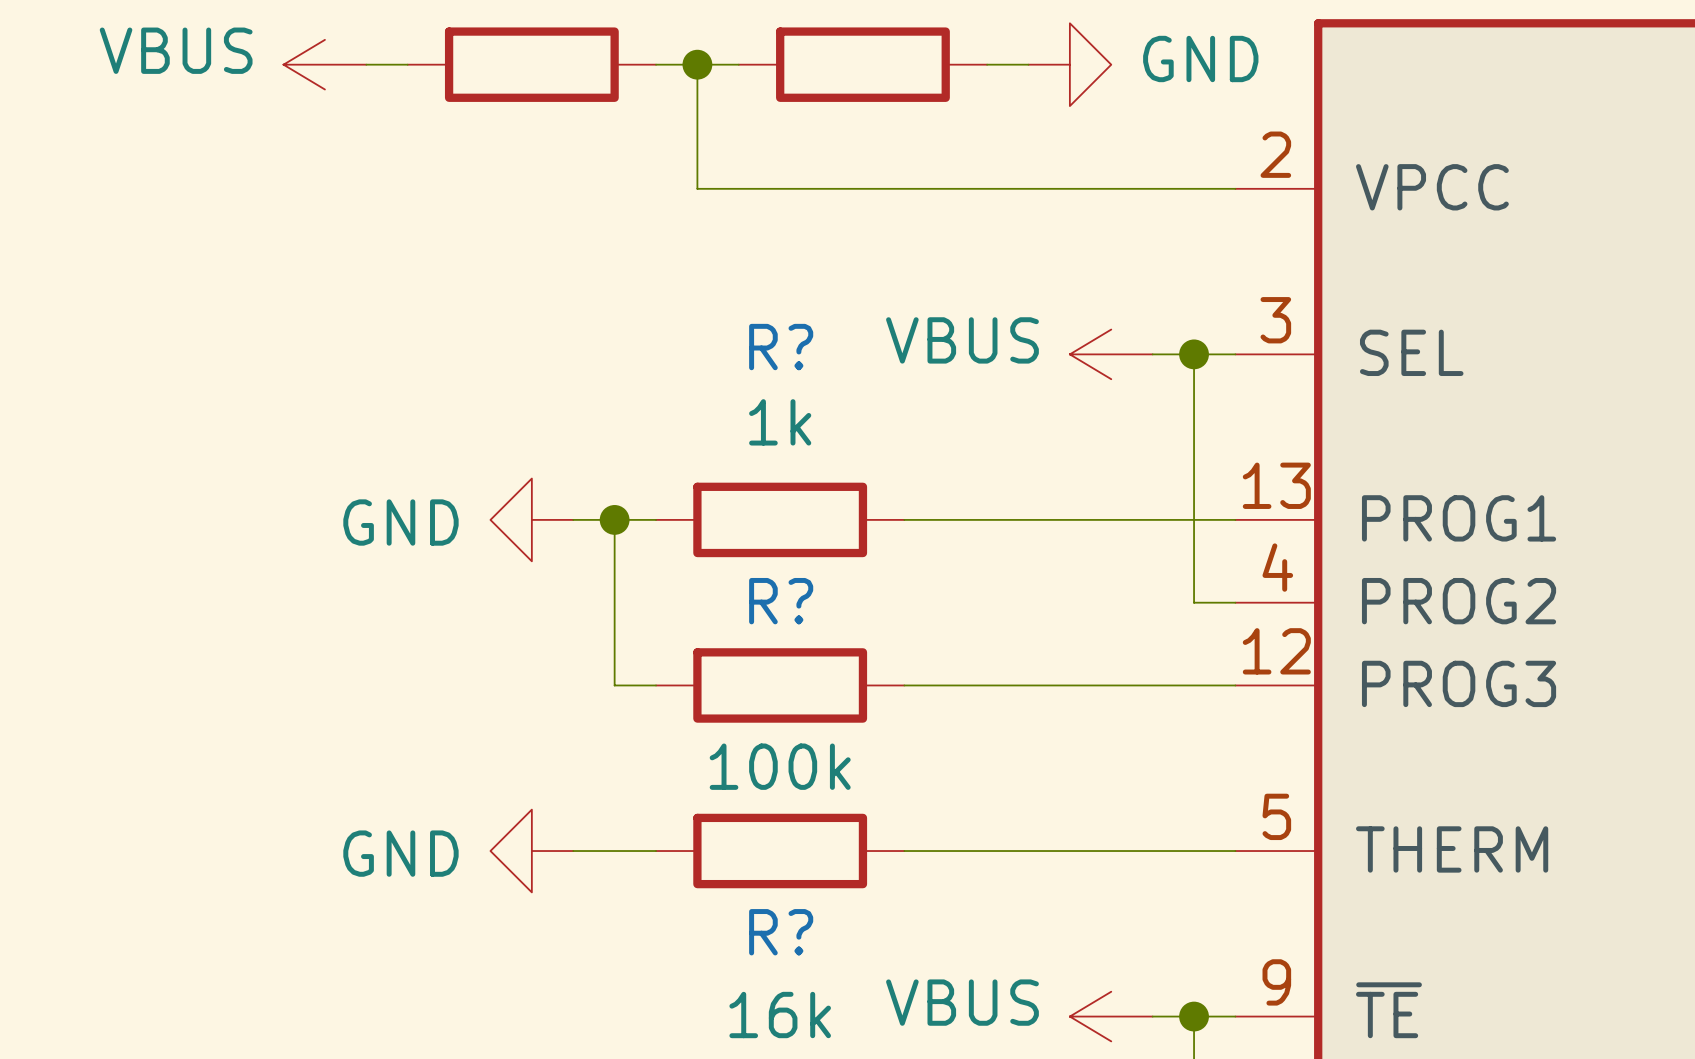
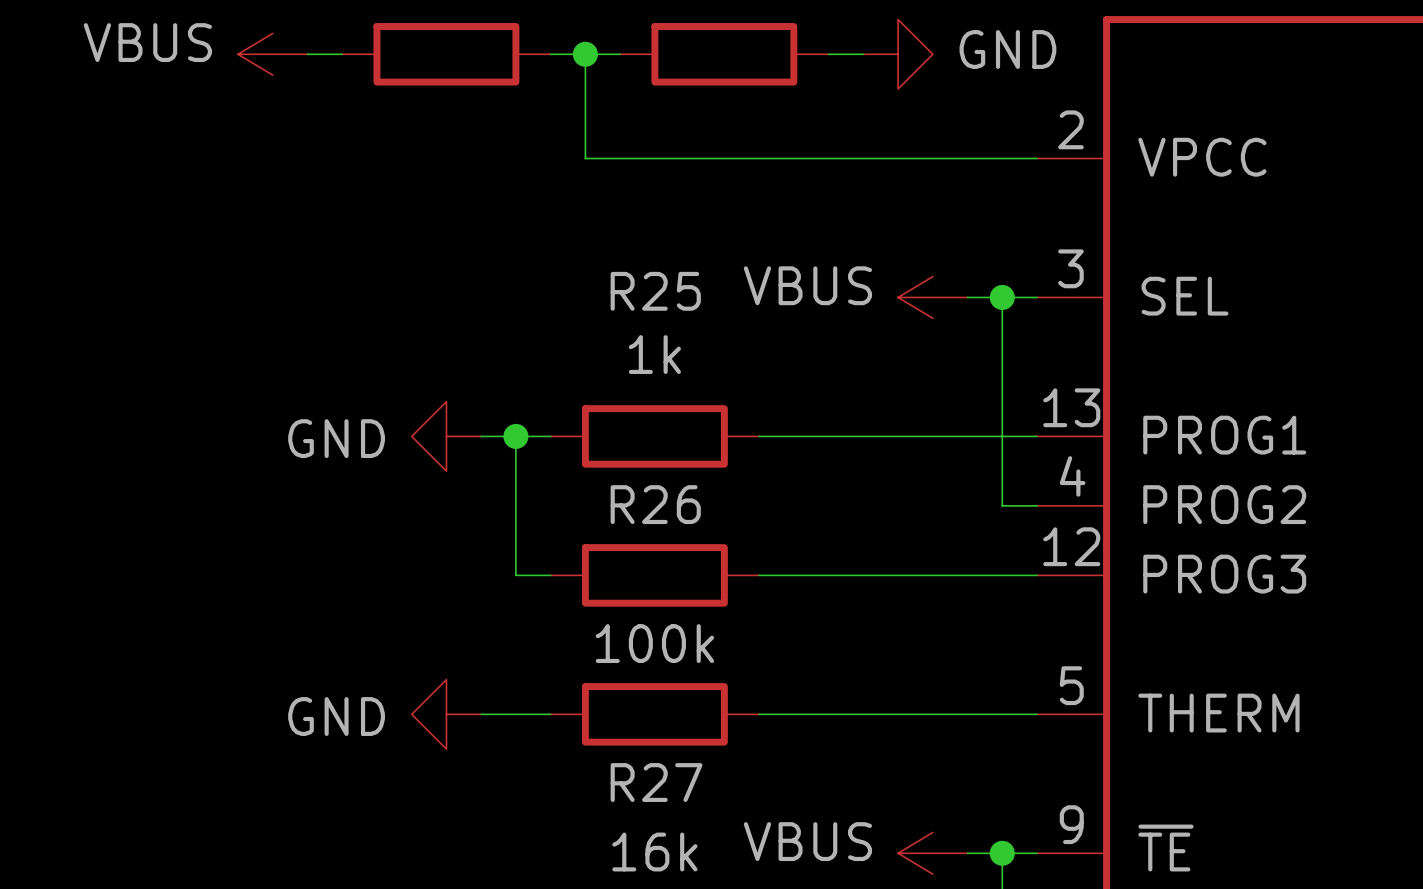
R? name: R? (781, 347) -> R25 (655, 291)
R? name: R? (781, 601) -> R26 (655, 504)
R? name: R? (781, 932) -> R27 (656, 782)

